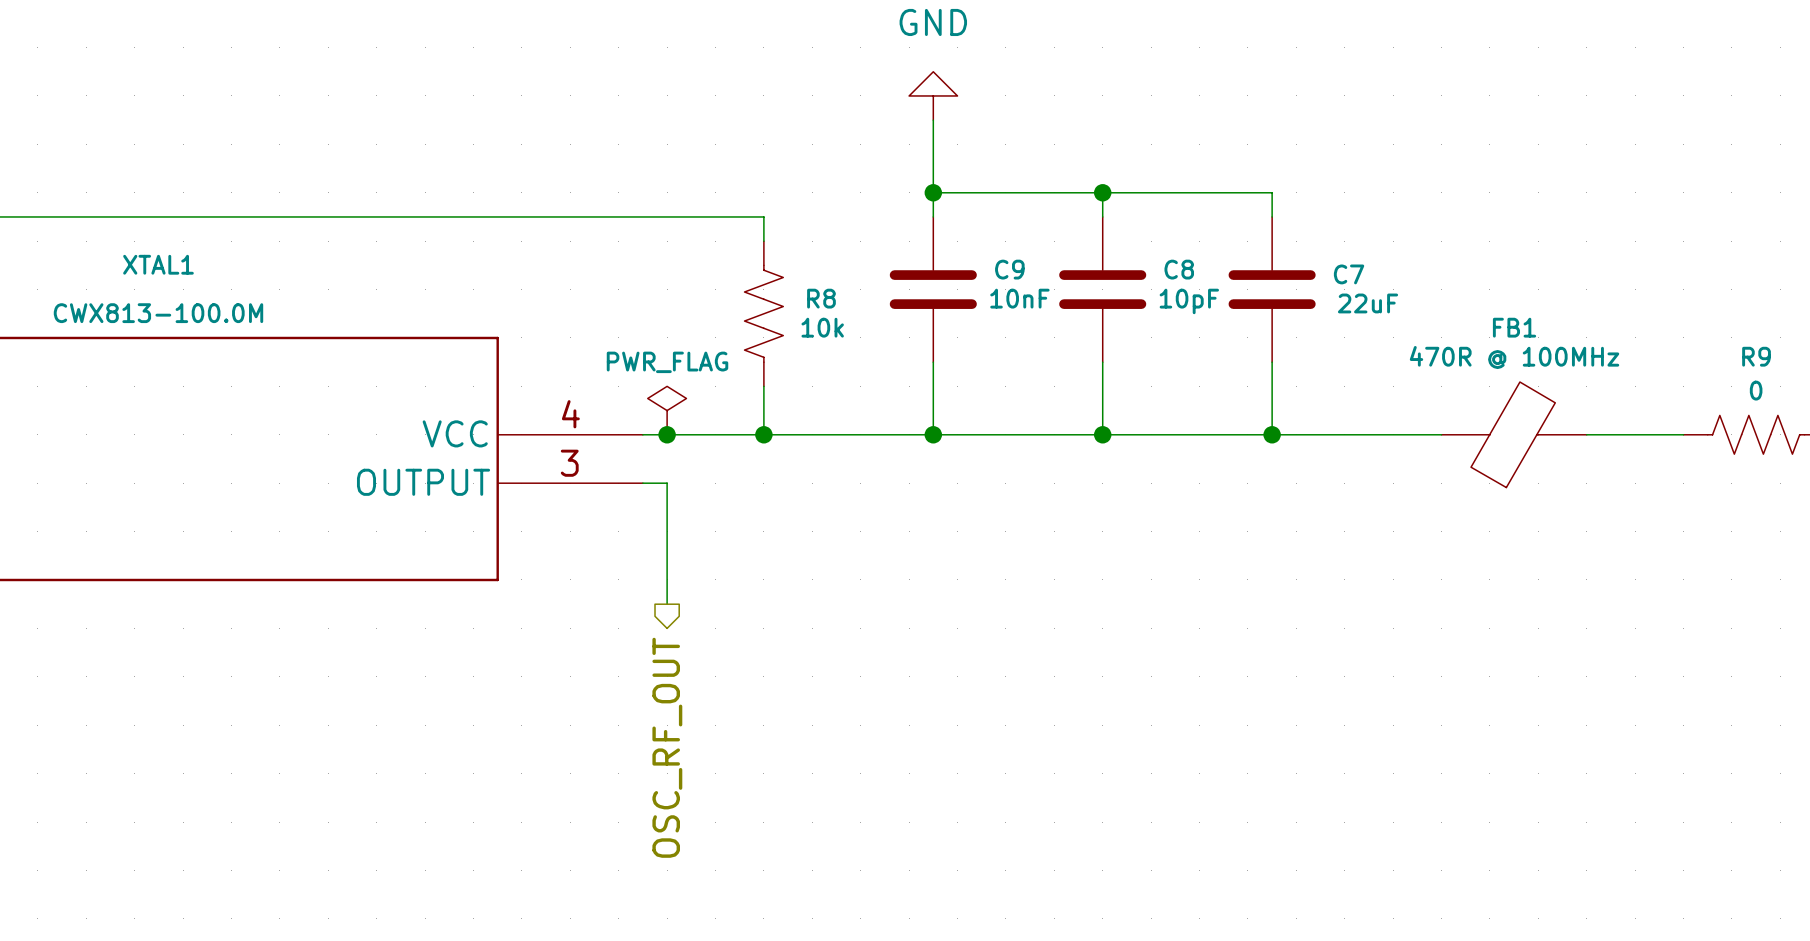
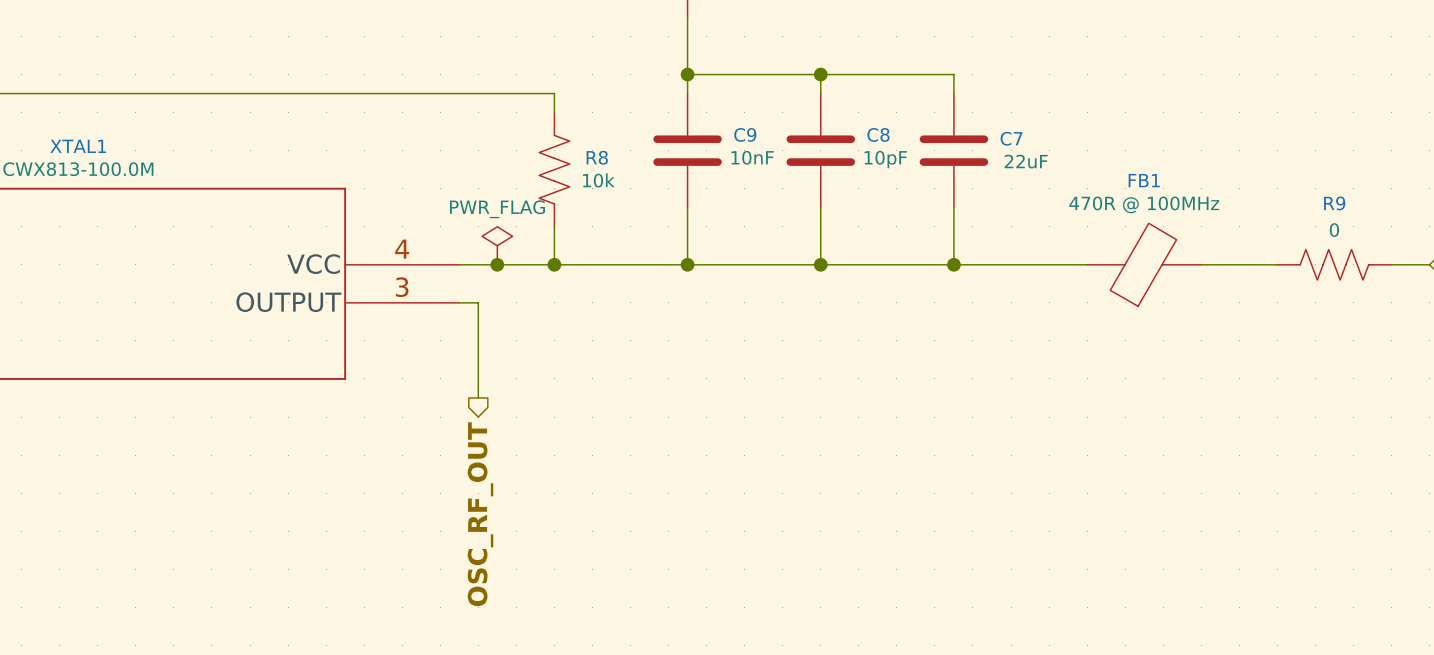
XTAL1 name position: XTAL1 (158, 264) -> XTAL1 (78, 146)
power symbol position: PWR_FLAG (667, 410) -> PWR_FLAG (497, 245)
junction position: (667, 434) -> (497, 264)

